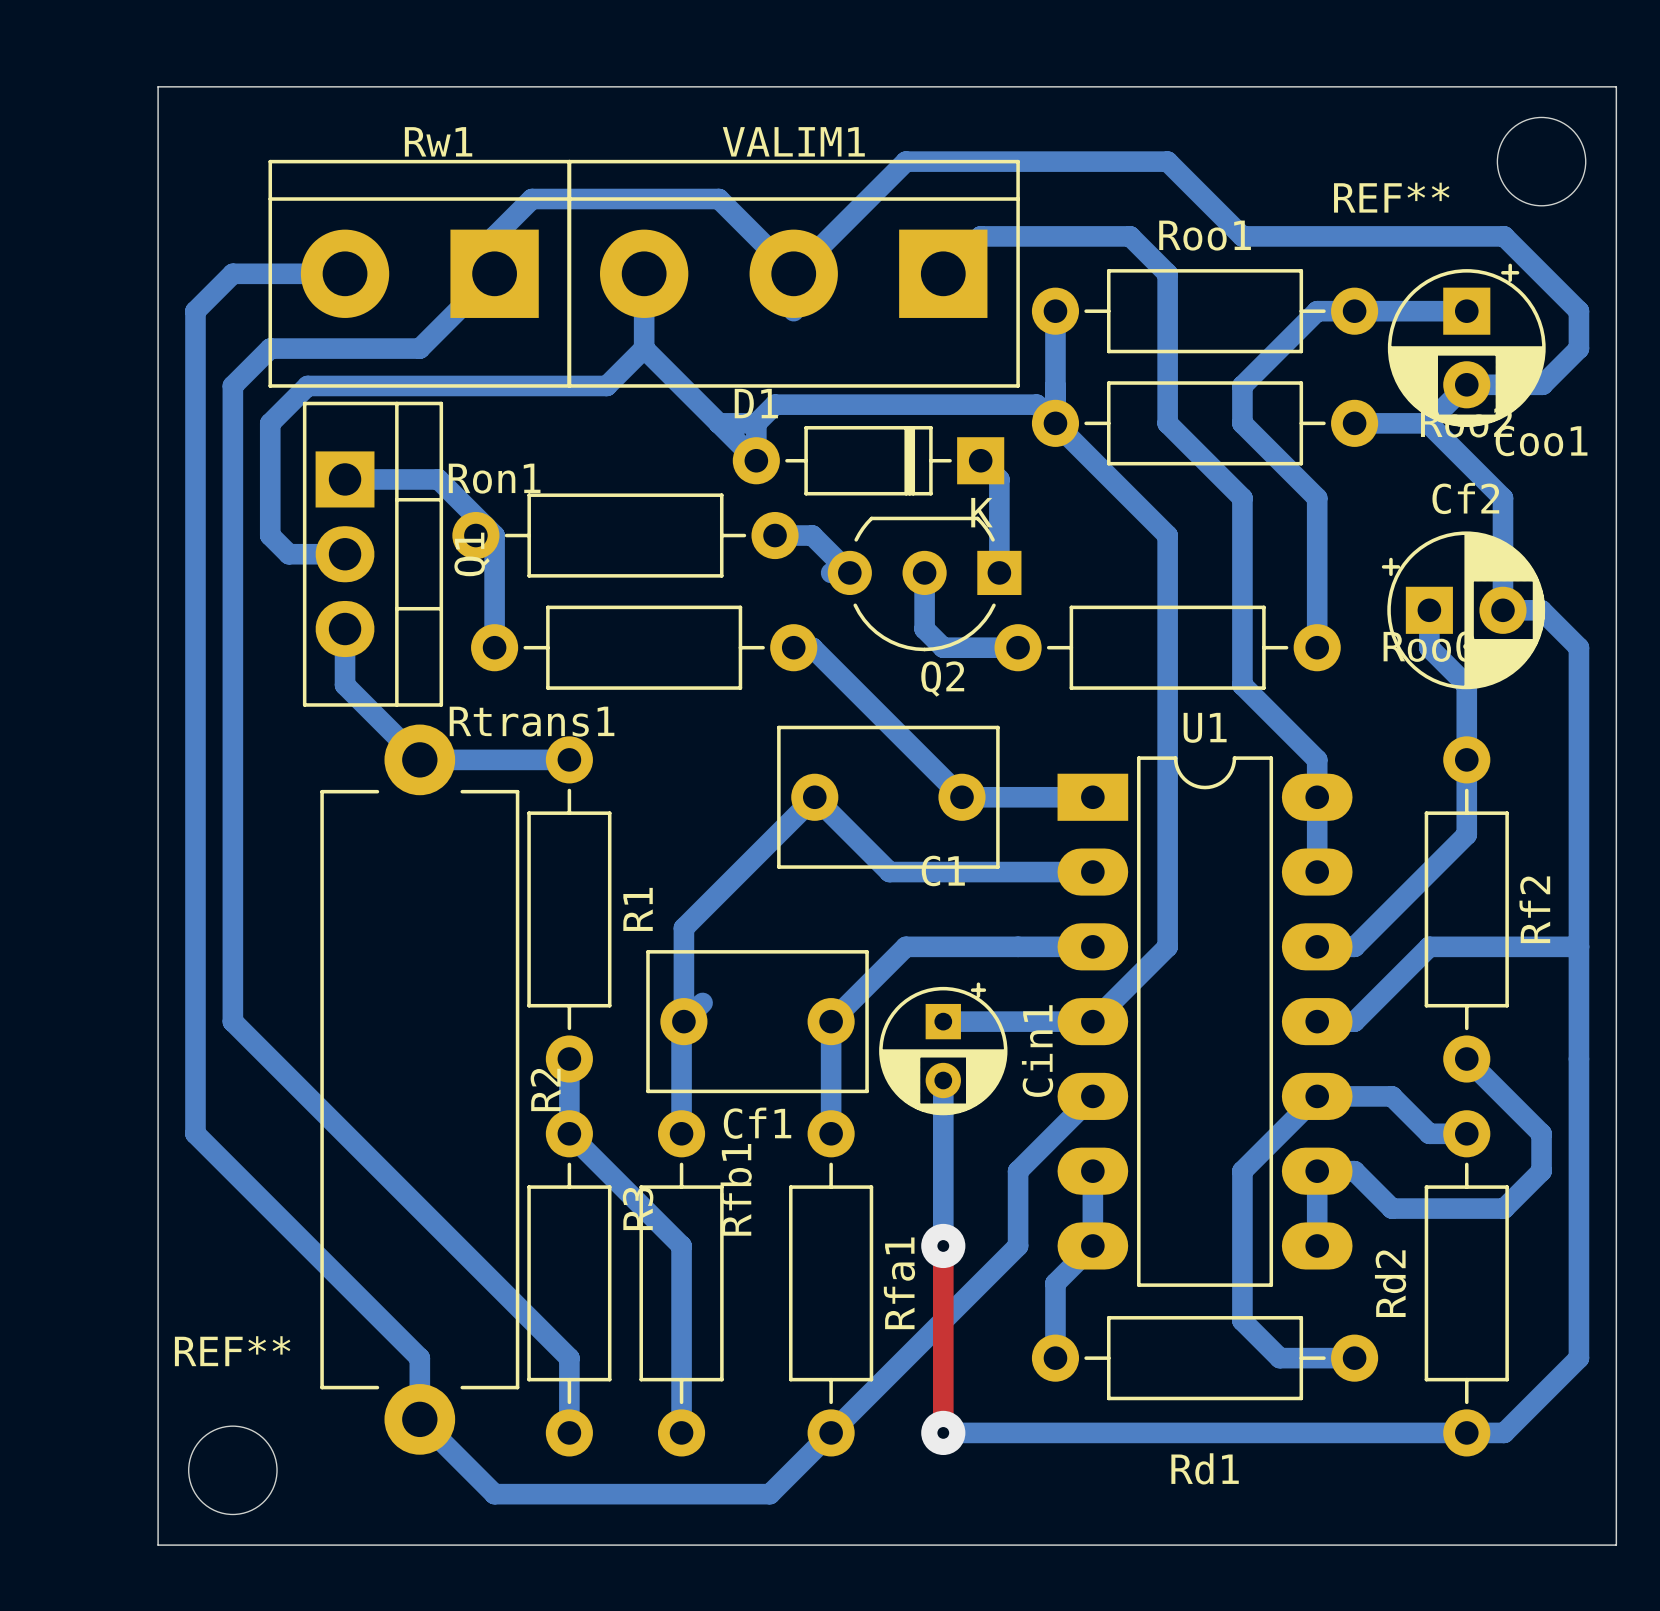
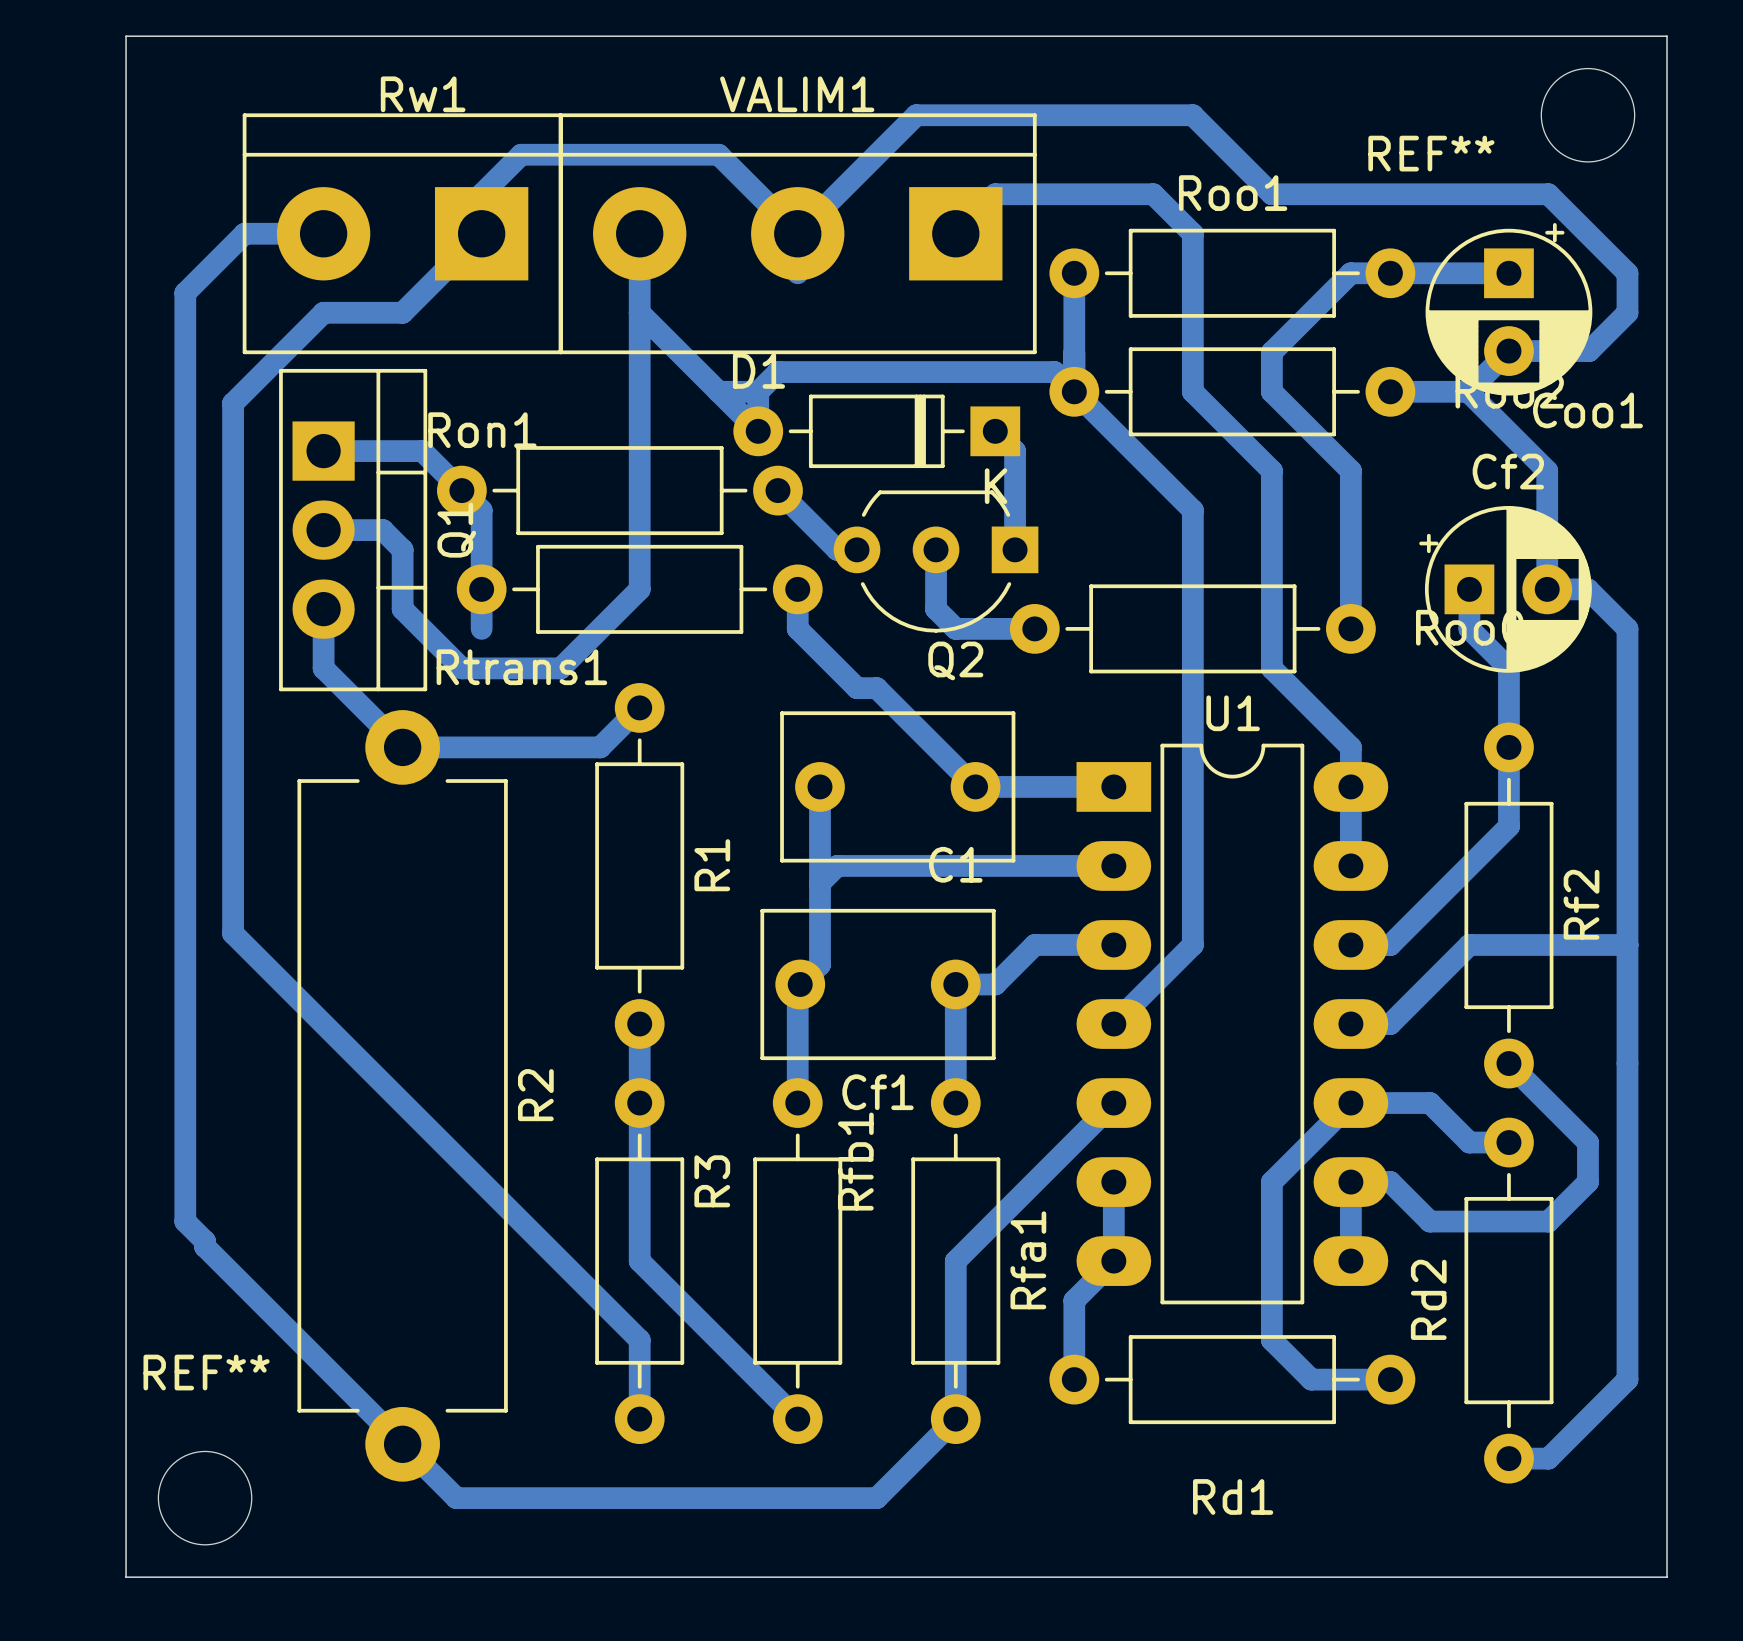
bottom track: (270, 273) (232, 273) (195, 311) (195, 1133) (419, 1358) (419, 1419) -> (244, 233) (185, 293) (185, 1221) (205, 1241) (205, 1246) (402, 1444)
bottom track: (345, 348) (270, 348) (232, 385) (232, 1021) (569, 1358) (569, 1432) -> (323, 312) (284, 352)
bottom track: (644, 348) (606, 385) (307, 385) -> (639, 312) (639, 589) (560, 668) (461, 668) (402, 609) (402, 549) (382, 530) (323, 530)
bottom track: (270, 423) (270, 535) (288, 554) (345, 554) -> (244, 391) (233, 403) (233, 933) (639, 1340) (639, 1419)
bottom track: none -> (777, 490) (837, 549)
Ron1 position: (625, 535) -> (619, 490)
bottom track: (775, 535) (812, 535) (849, 572) -> none
Rtrans1 position: (644, 647) -> (639, 589)
bottom track: (793, 647) (812, 647) (868, 703) -> (797, 589) (797, 628) (857, 688) (876, 688)
bottom track: none -> (639, 707) (600, 747) (560, 747)
bottom track: none -> (819, 786) (819, 964) (797, 986) (797, 1103)
bottom track: (889, 872) (814, 797) (683, 928) (683, 1021) -> (899, 865) (837, 865) (819, 883)
R1 position: (569, 909) -> (639, 865)
bottom track: (1018, 946) (905, 946) (831, 1021) (831, 1133) -> (1034, 944) (995, 984) (955, 984) (955, 1086)
bottom track: (702, 1002) (681, 1023) (681, 1133) -> none
bottom track: none -> (639, 1024) (639, 1261) (797, 1419)
Cf1 position: (757, 1021) -> (878, 984)
bottom track: (943, 1021) (1092, 1021) -> none
Cin1: (943, 1048) -> none
bottom track: (569, 1059) (569, 1133) (681, 1245) (681, 1432) -> none
bottom track: (943, 1096) (943, 1245) -> none
bottom track: (1018, 1171) (1018, 1245) (769, 1494) (494, 1494) (470, 1470) -> (1034, 1182) (955, 1261) (955, 1419) (876, 1498) (456, 1498)
top track: (943, 1245) (943, 1432) -> none
via: (943, 1245) -> none
R3 position: (569, 1283) -> (639, 1261)
Rfb1 position: (681, 1283) -> (797, 1261)
Rfa1 position: (831, 1283) -> (955, 1261)
bottom track: (943, 1432) (1466, 1432) -> none
via: (943, 1432) -> none

